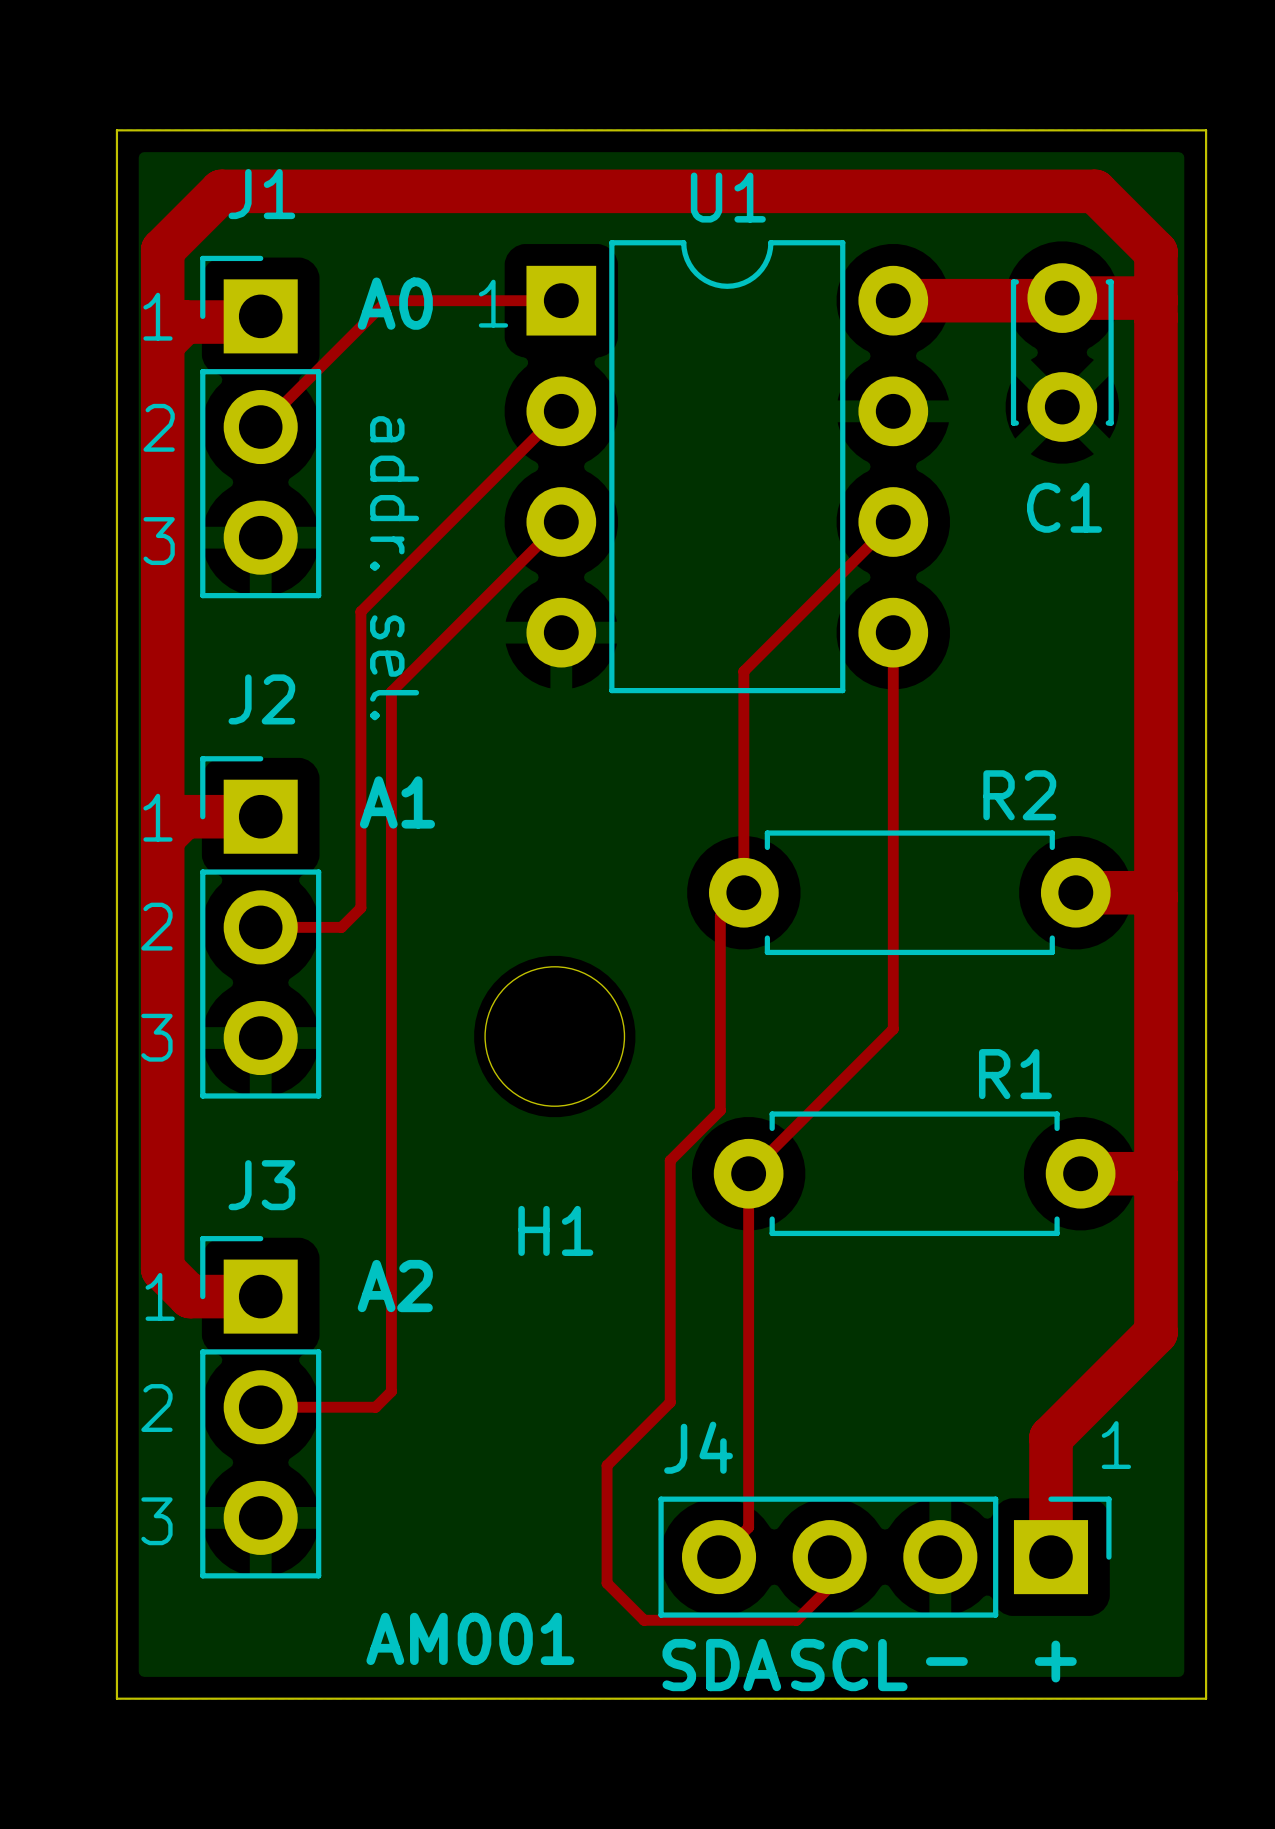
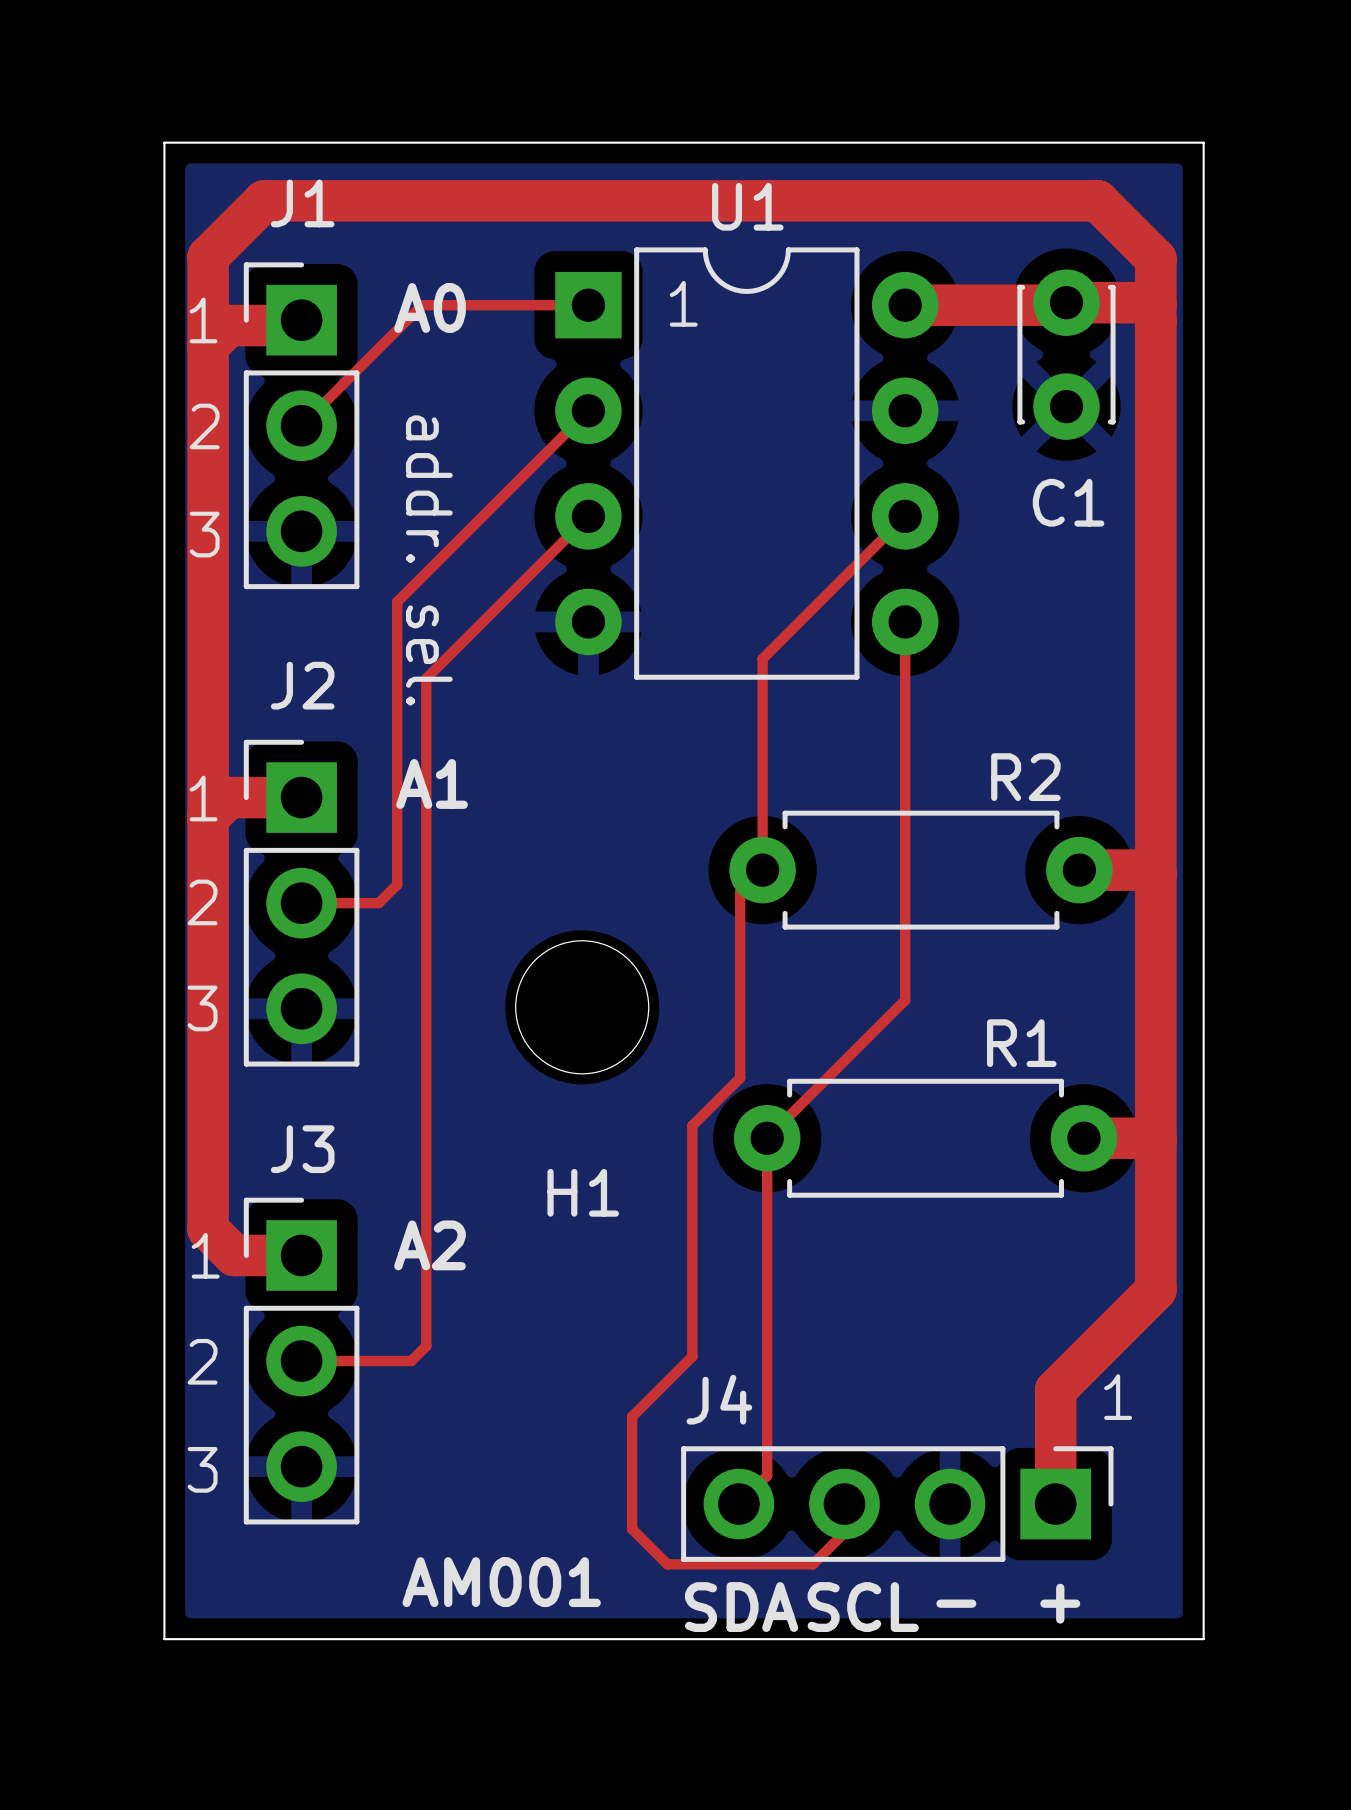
text position: 1 (493, 303) -> 1 (683, 303)

